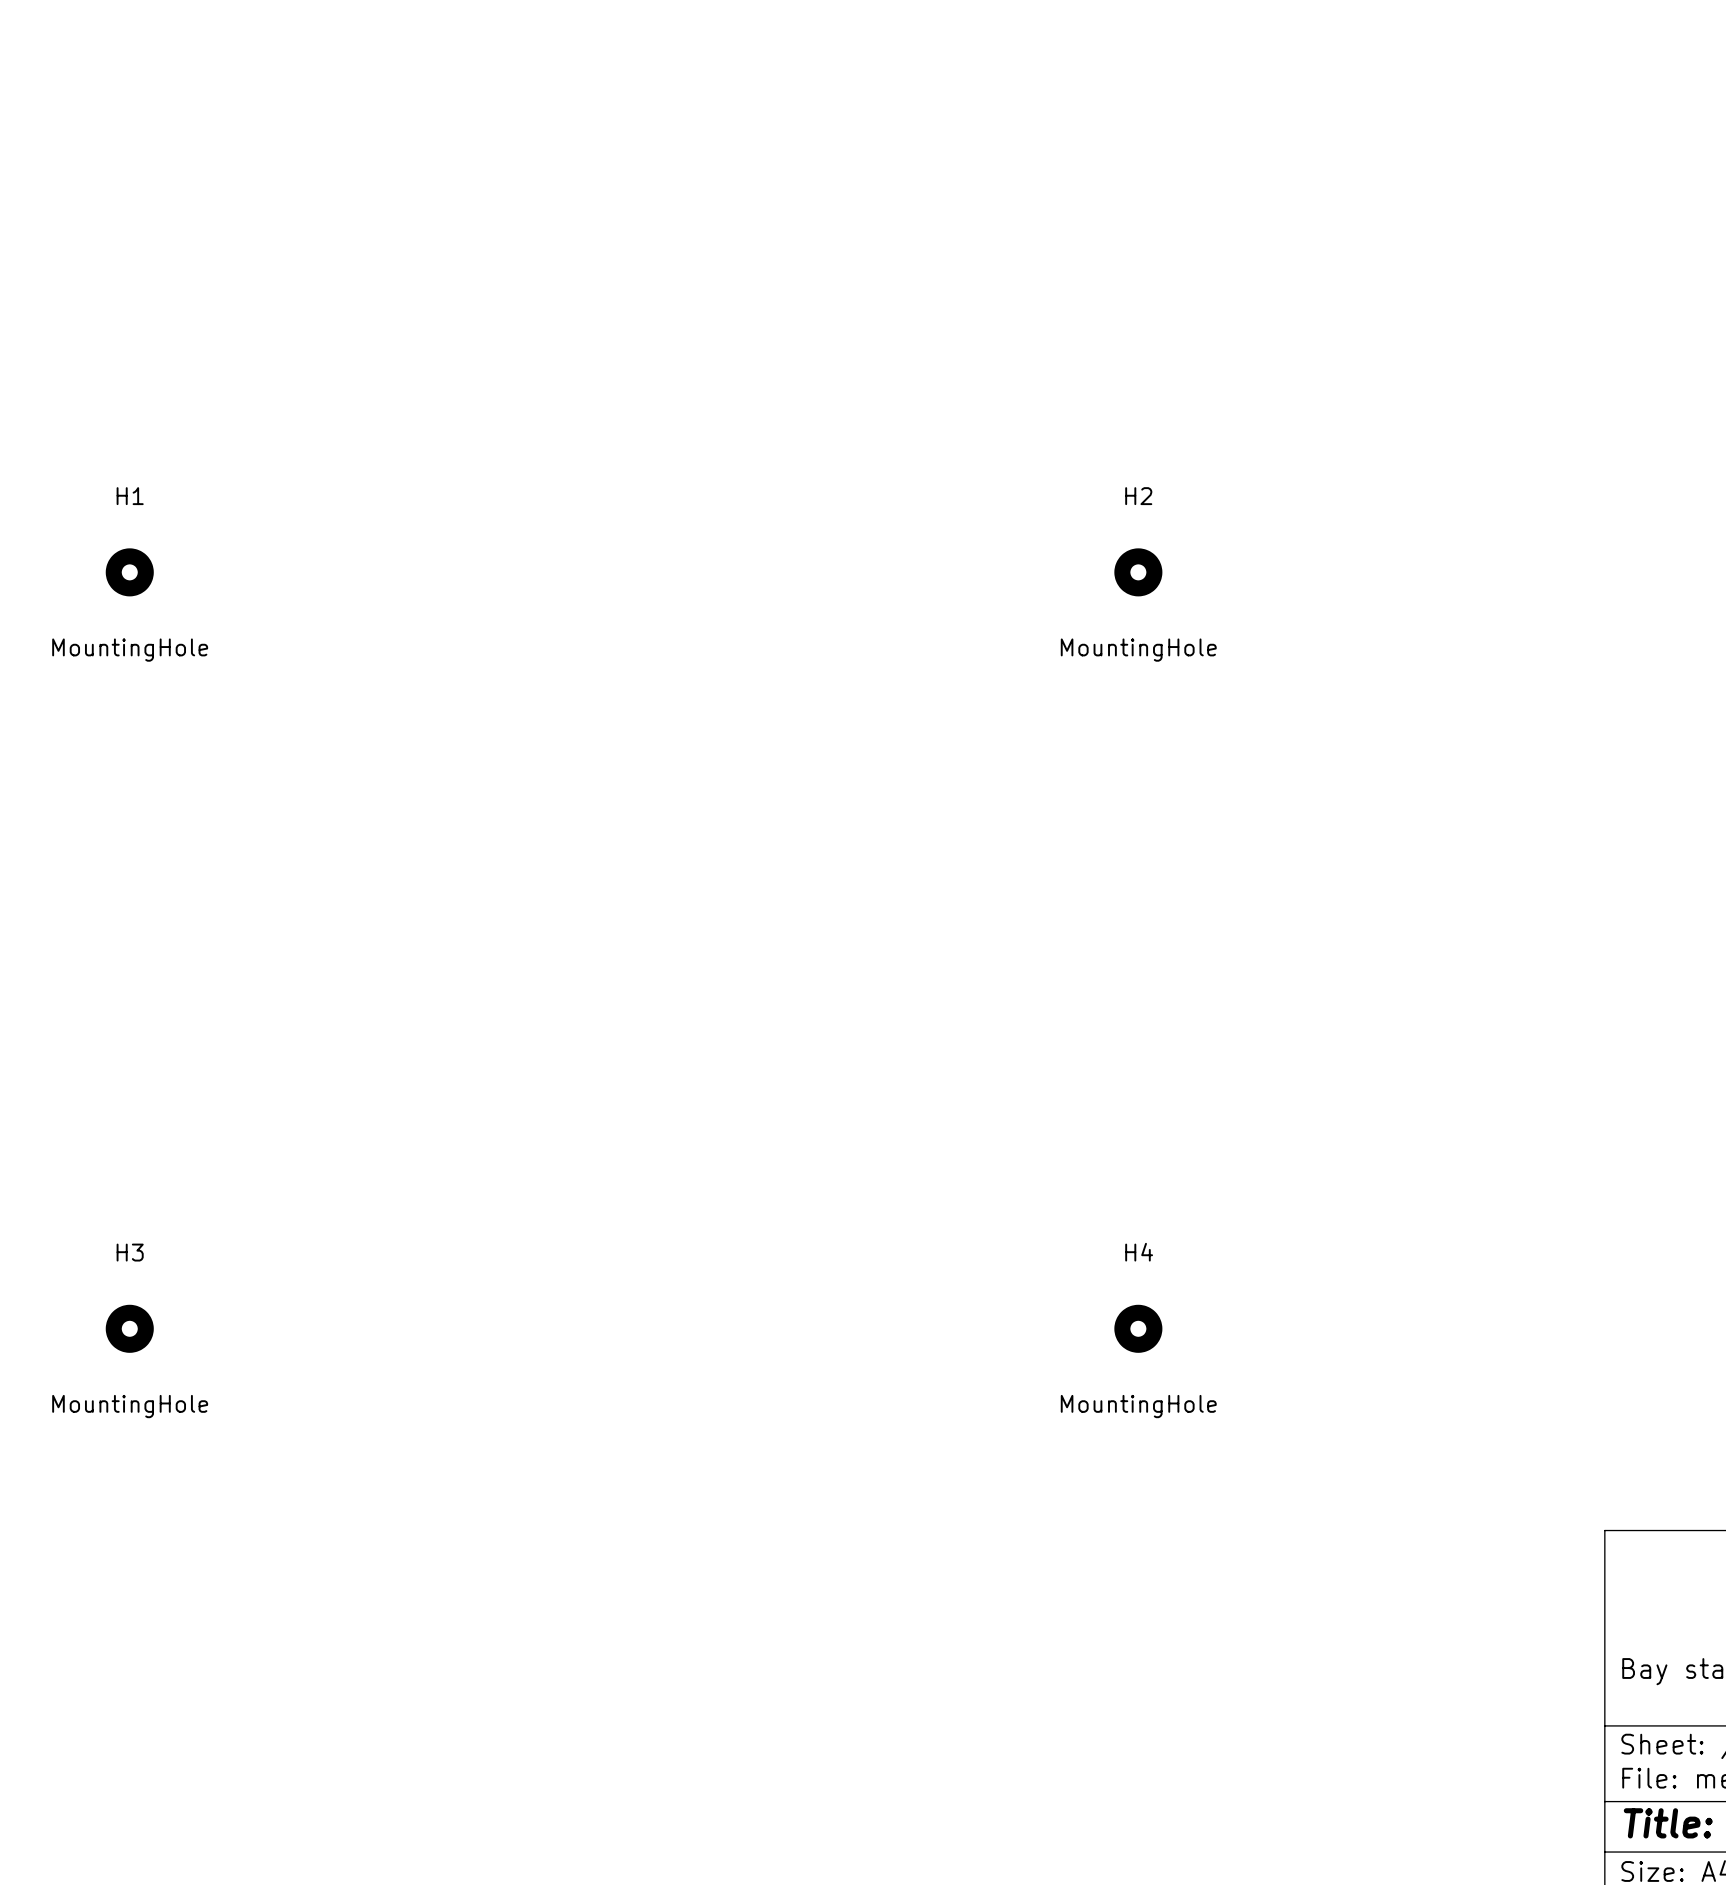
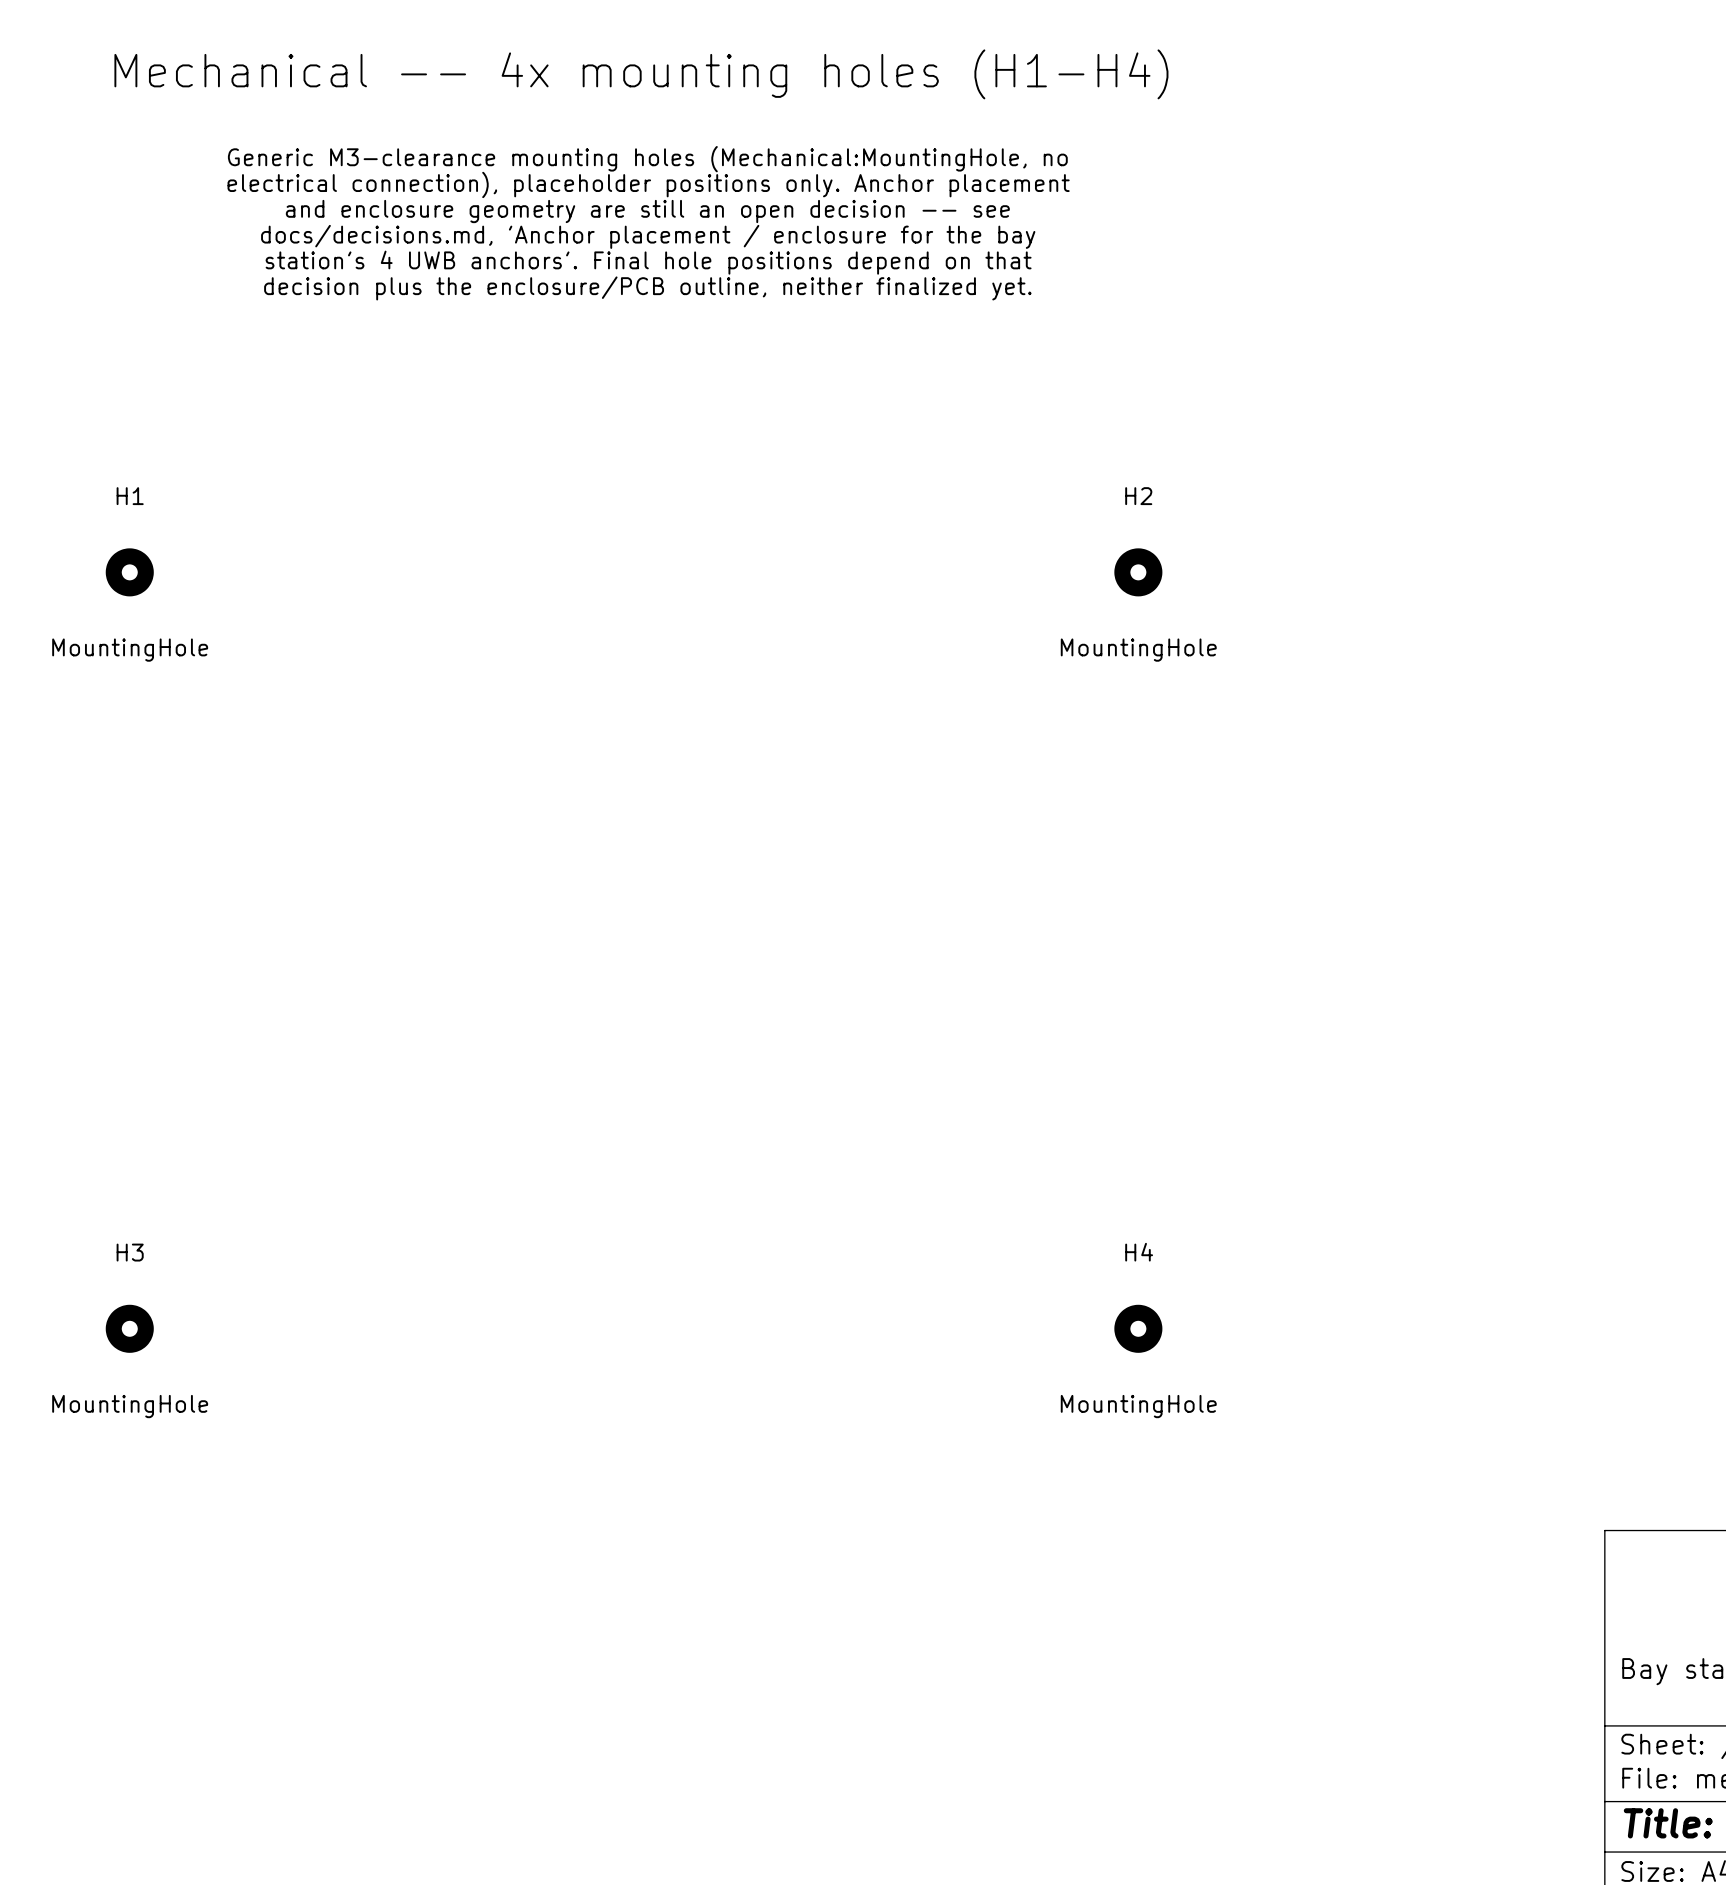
text: none -> Mechanical -- 4x mounting holes (H1-H4) (641, 74)
text: none -> Generic M3-clearance mounting holes (Mechanical:MountingHole, no (647, 159)
text: none -> electrical connection), placeholder positions only. Anchor placement (648, 184)
text: none -> and enclosure geometry are still an open decision -- see (647, 211)
text: none -> docs/decisions.md, 'Anchor placement / enclosure for the bay (648, 236)
text: none -> station's 4 UWB anchors'. Final hole positions depend on that (648, 262)
text: none -> decision plus the enclosure/PCB outline, neither finalized yet. (647, 288)

